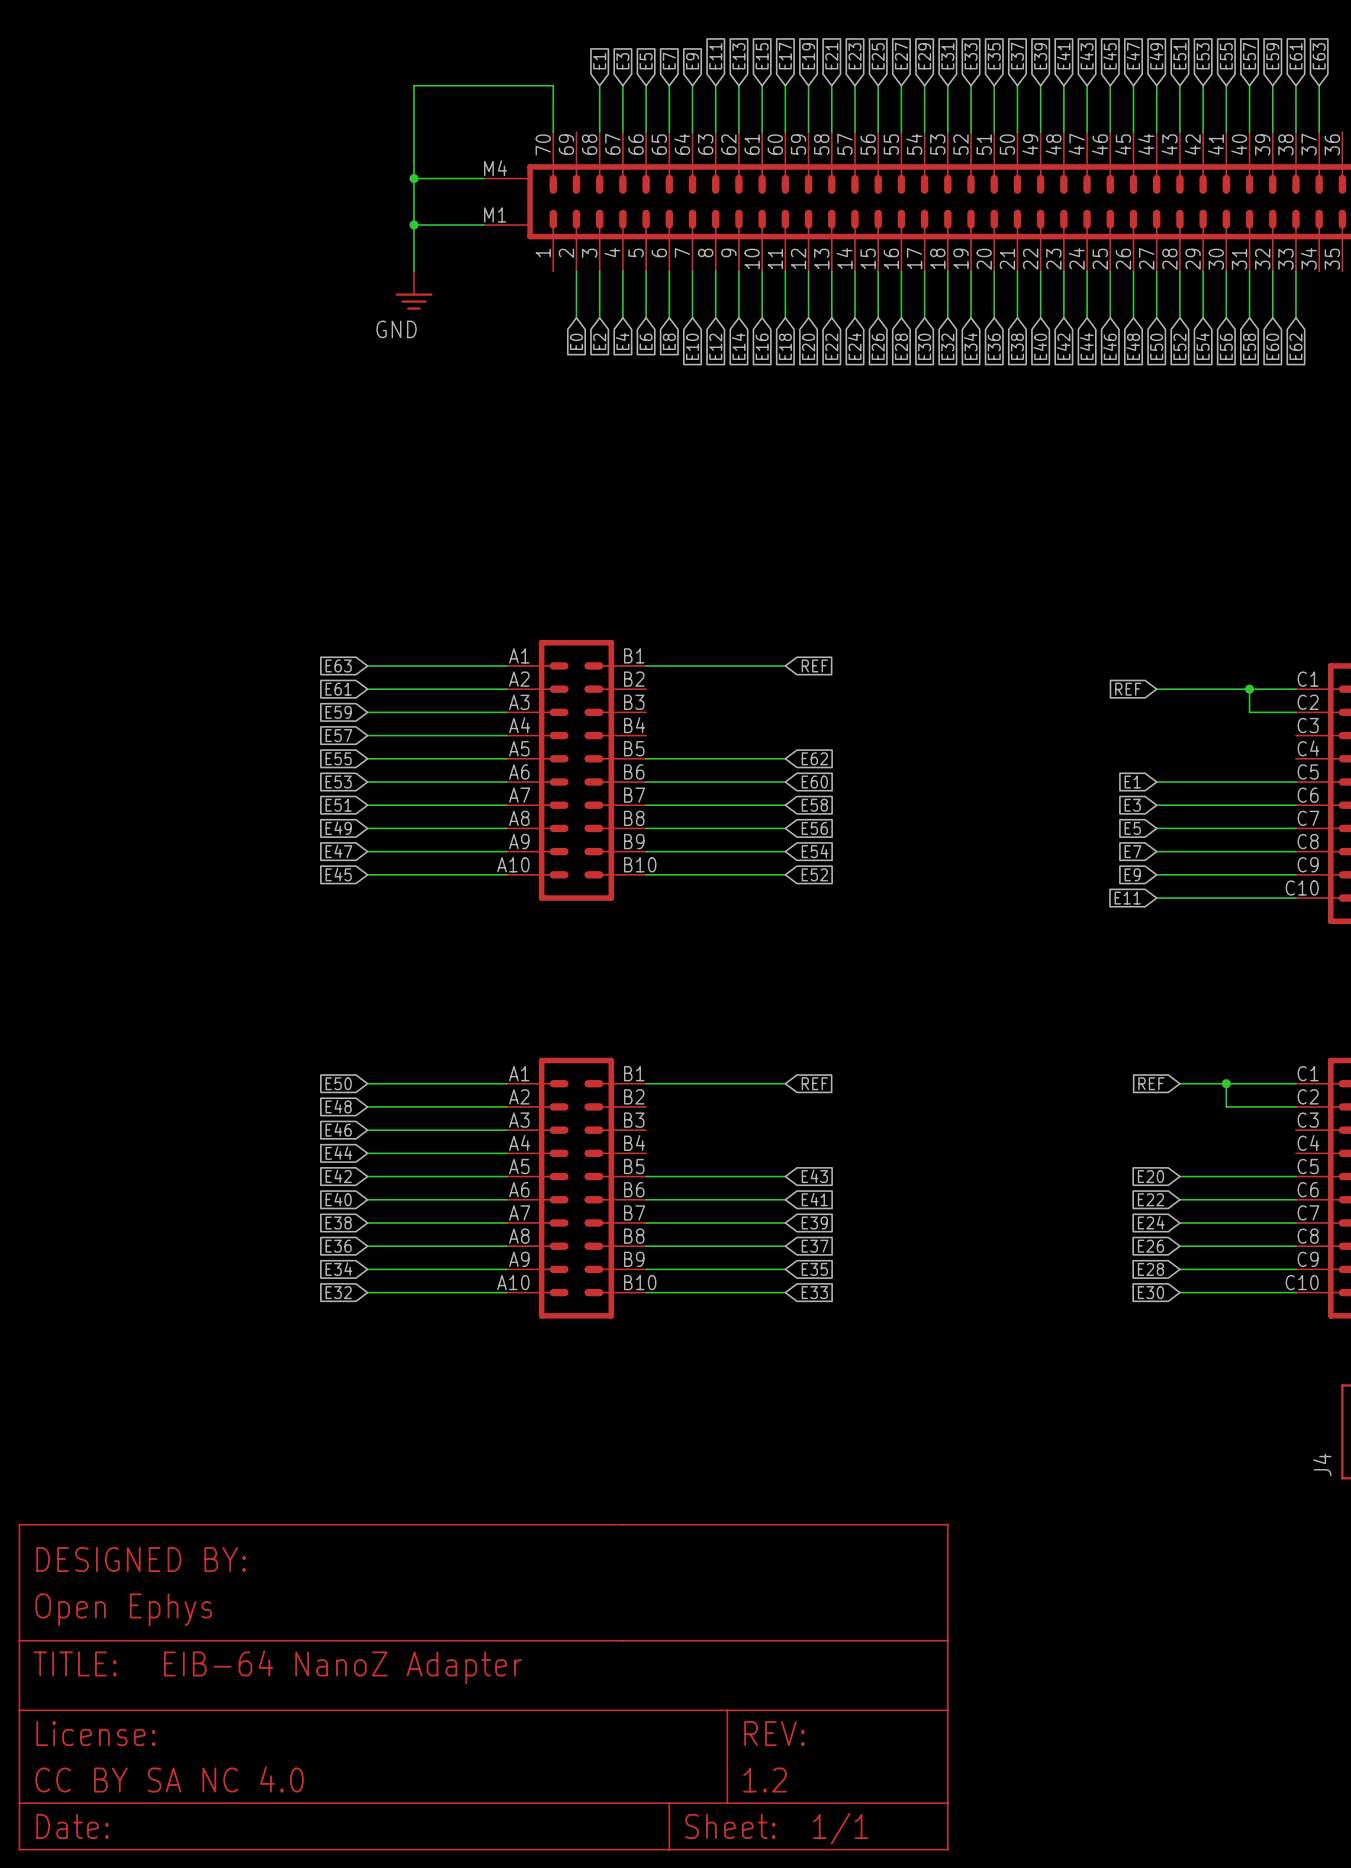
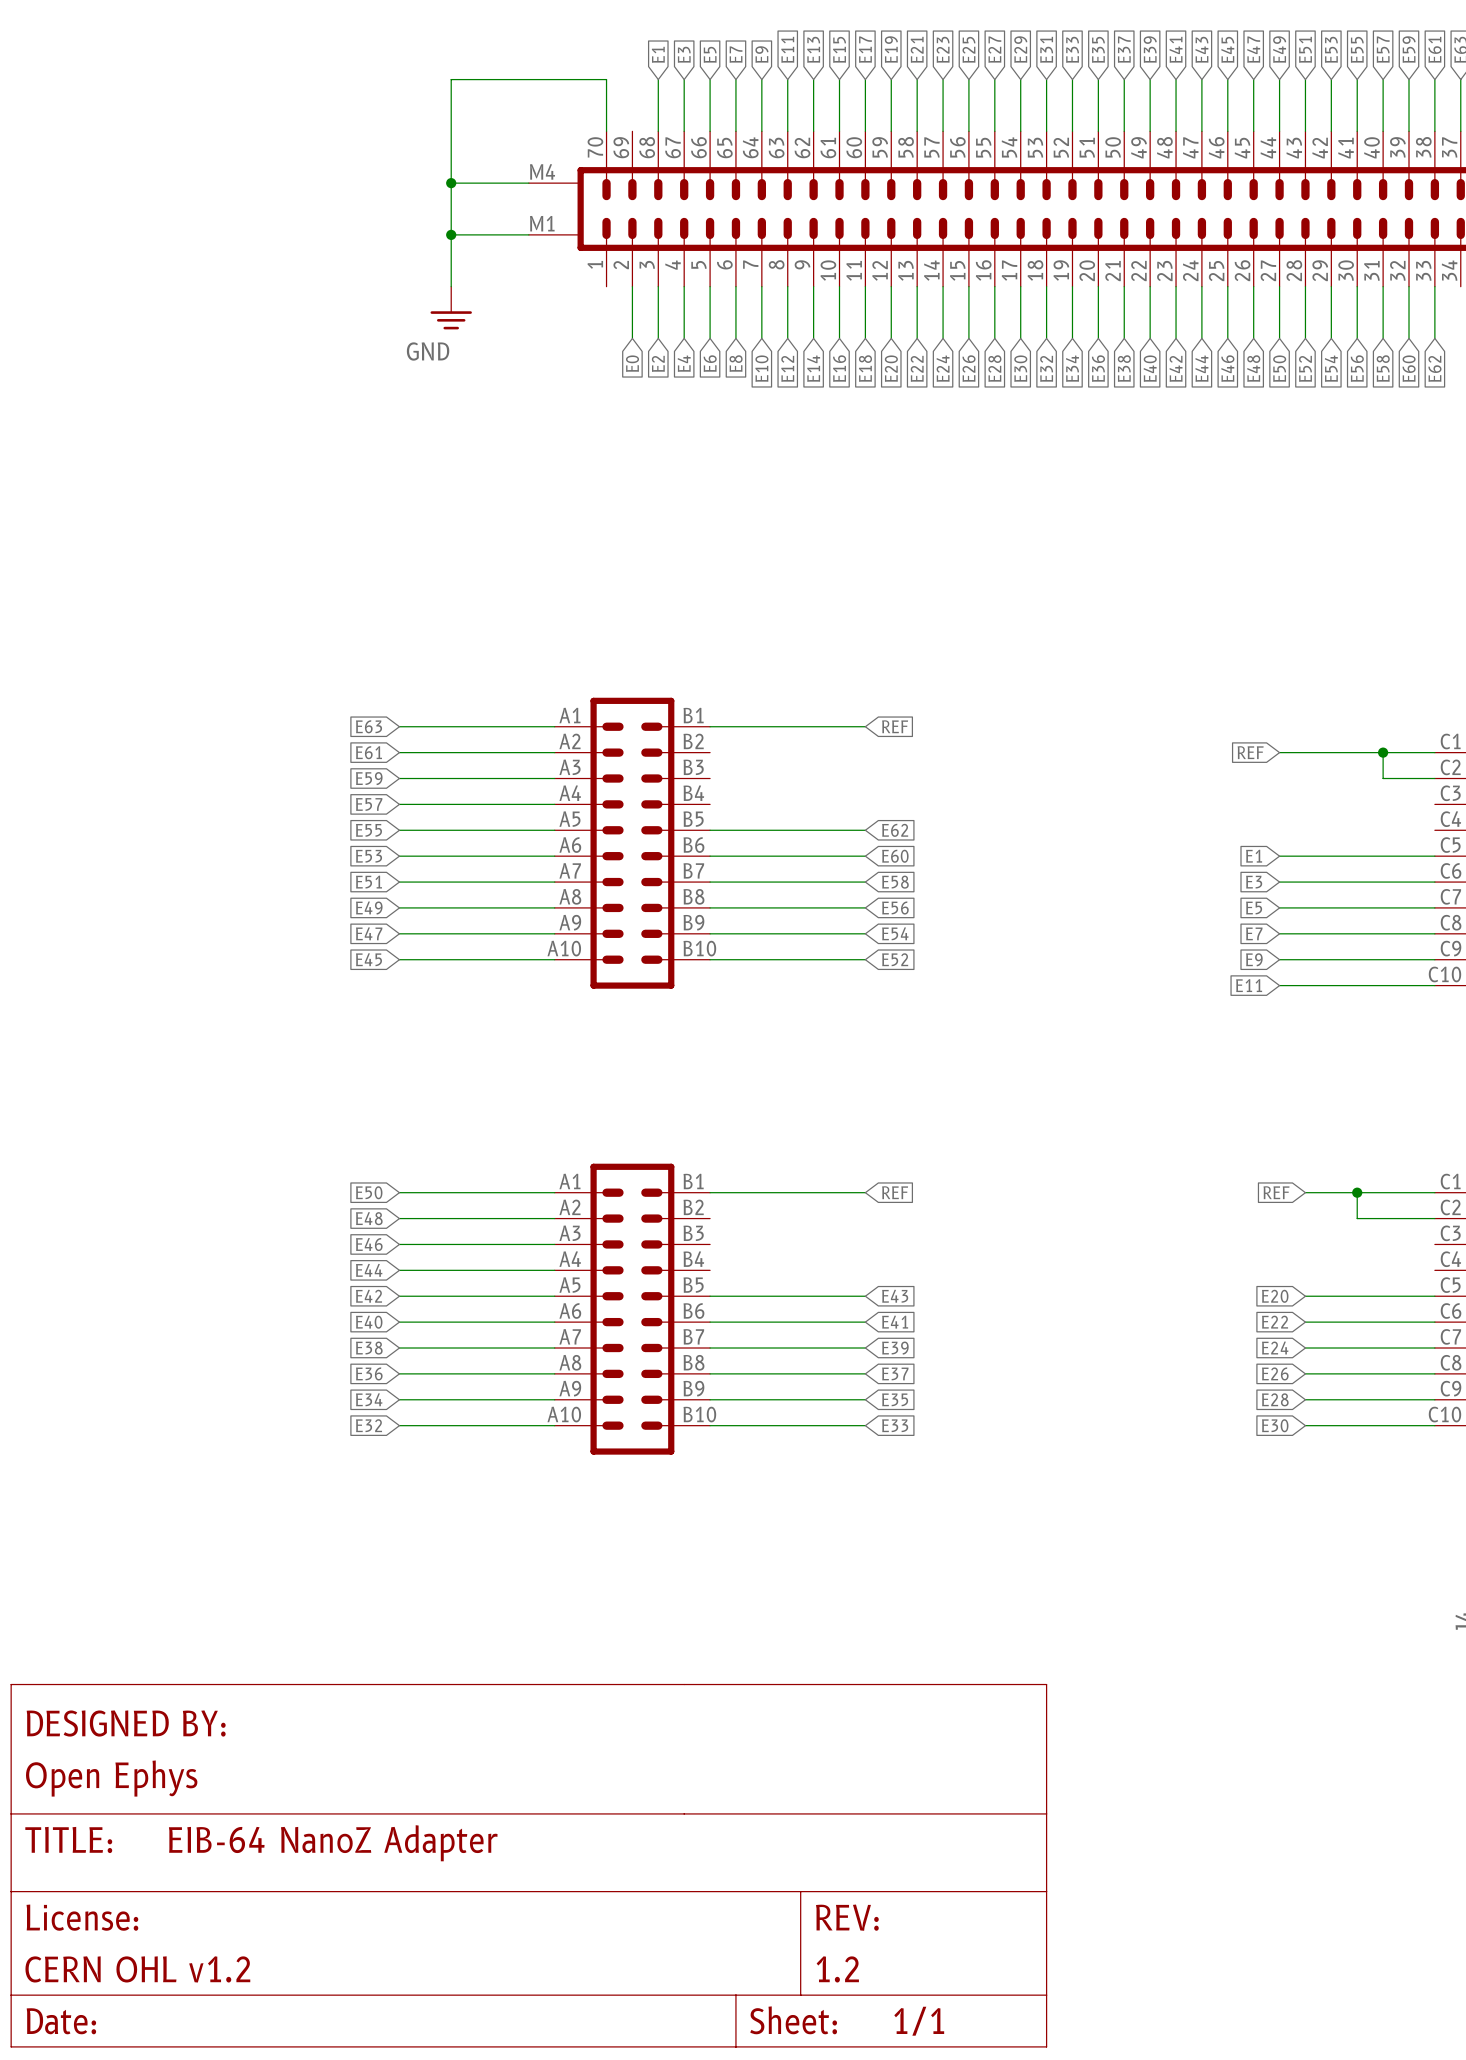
part text: CC BY SA NC 4.0 (169, 1779) -> CERN OHL v1.2 (137, 1969)

